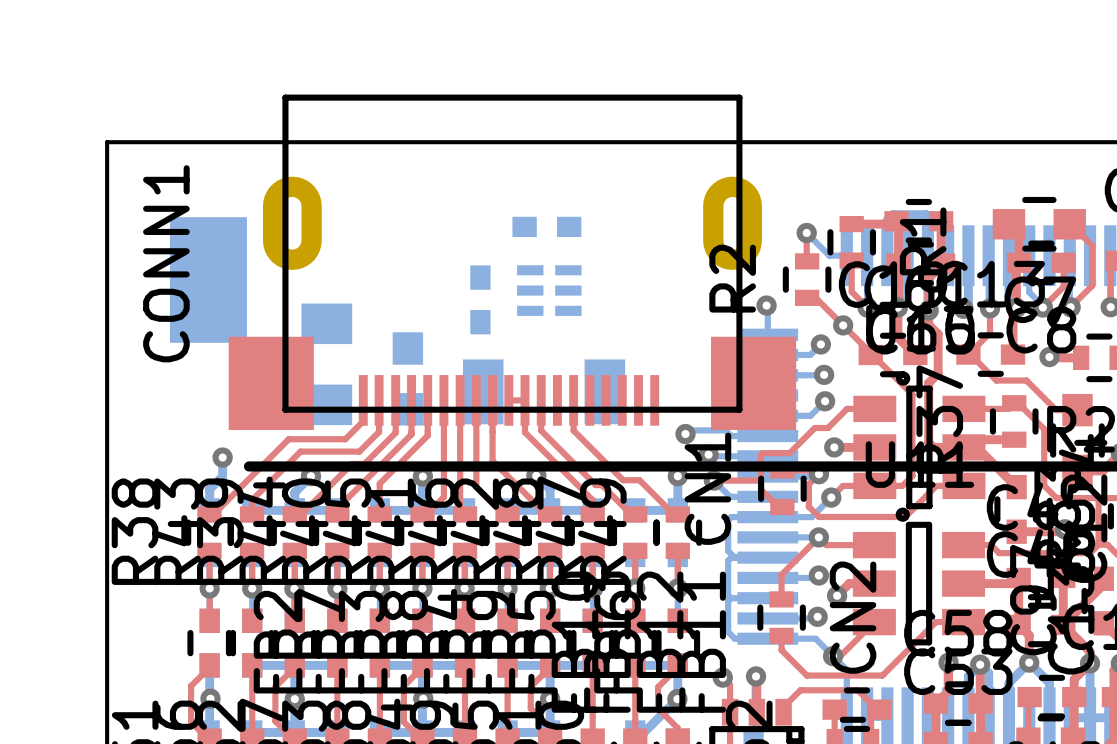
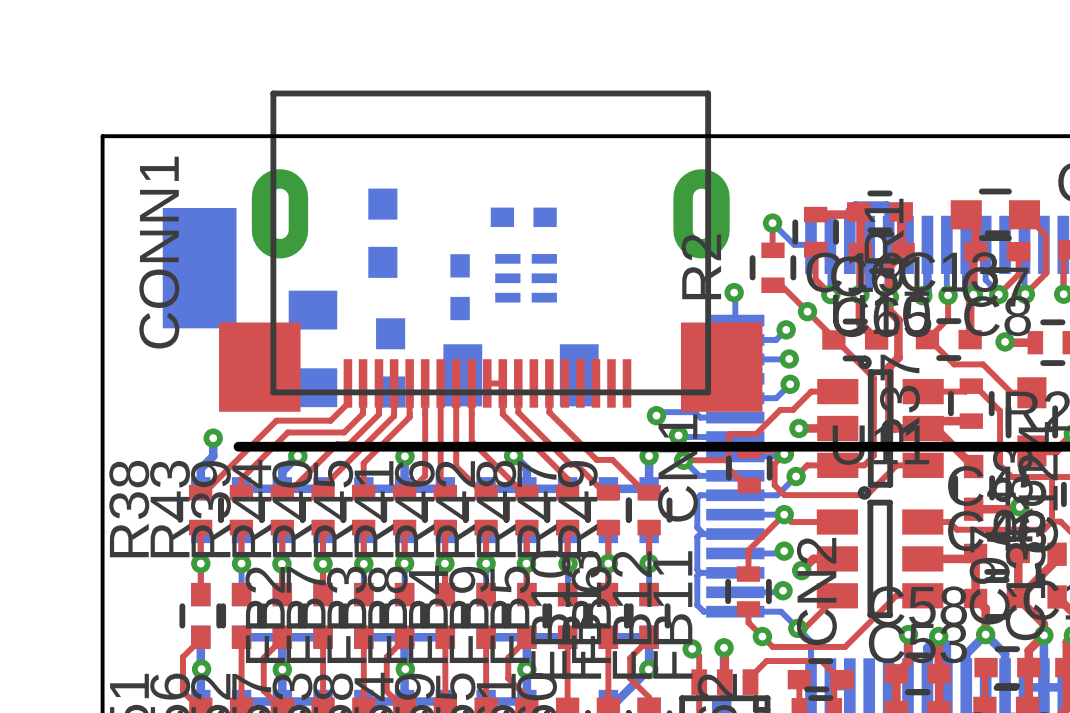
part: none -> (382, 233)
via: none -> (762, 636)

